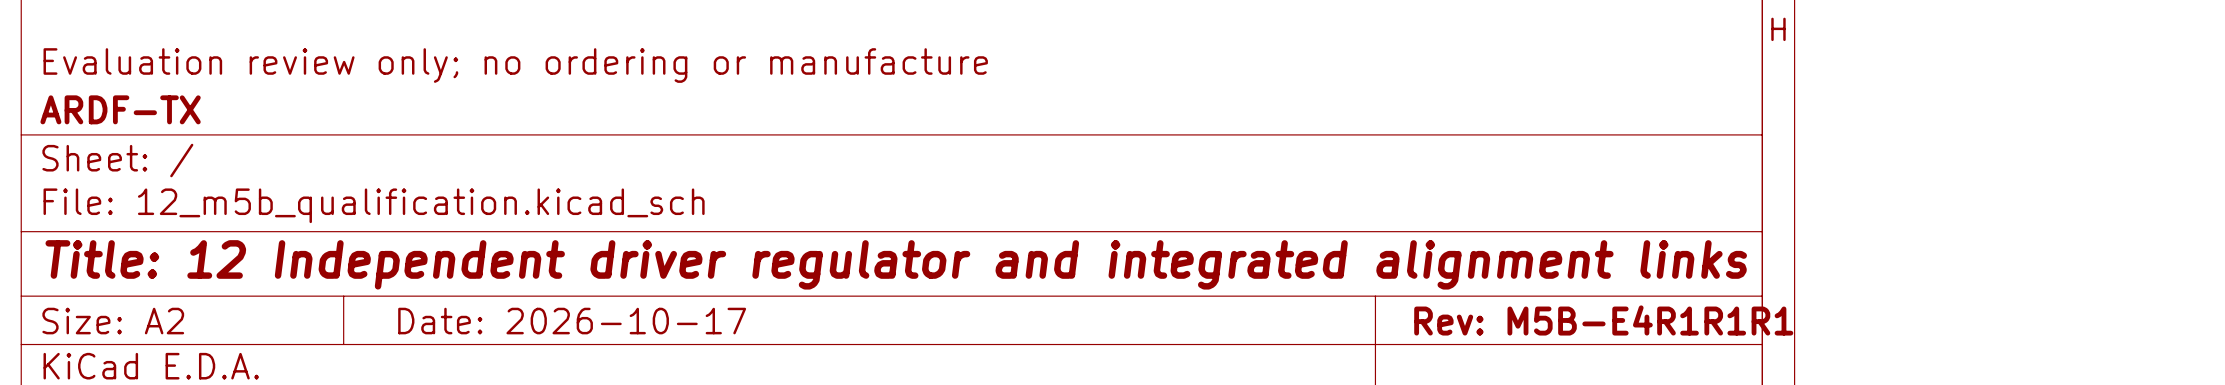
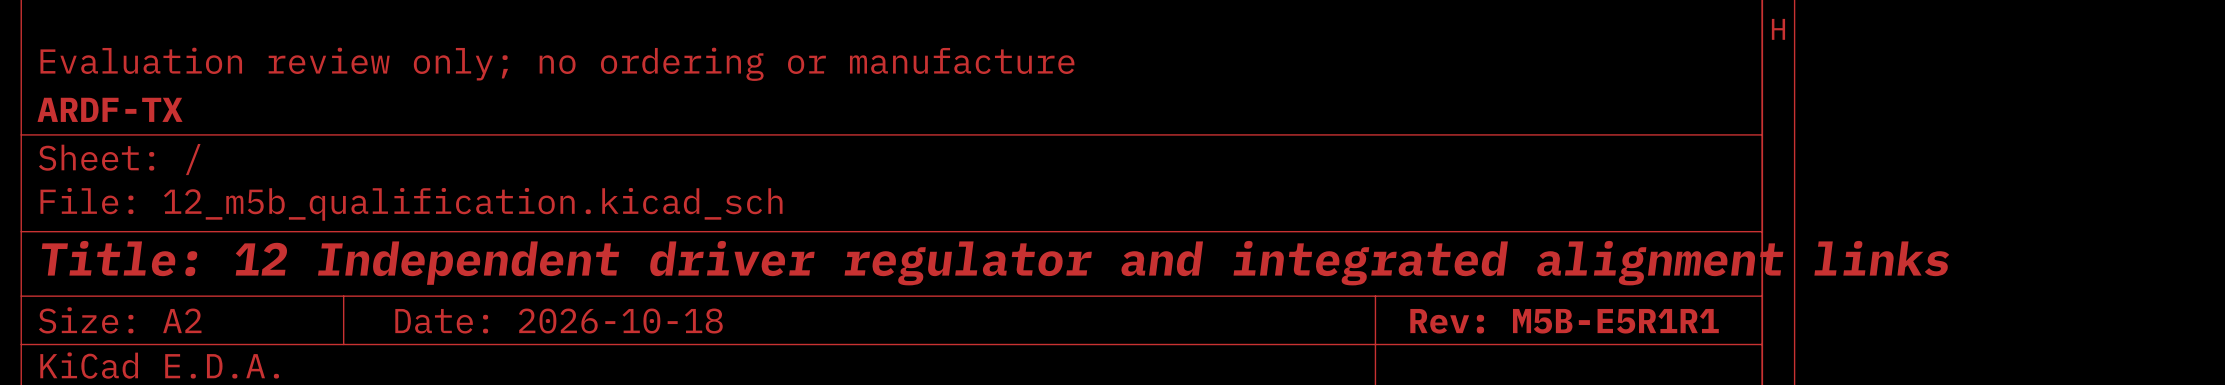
title block: Rev: M5B-E4R1R1R1 (1603, 320) -> Rev: M5B-E5R1R1 (1564, 321)
title block: Date: 2026-10-17 (572, 321) -> Date: 2026-10-18 (559, 321)

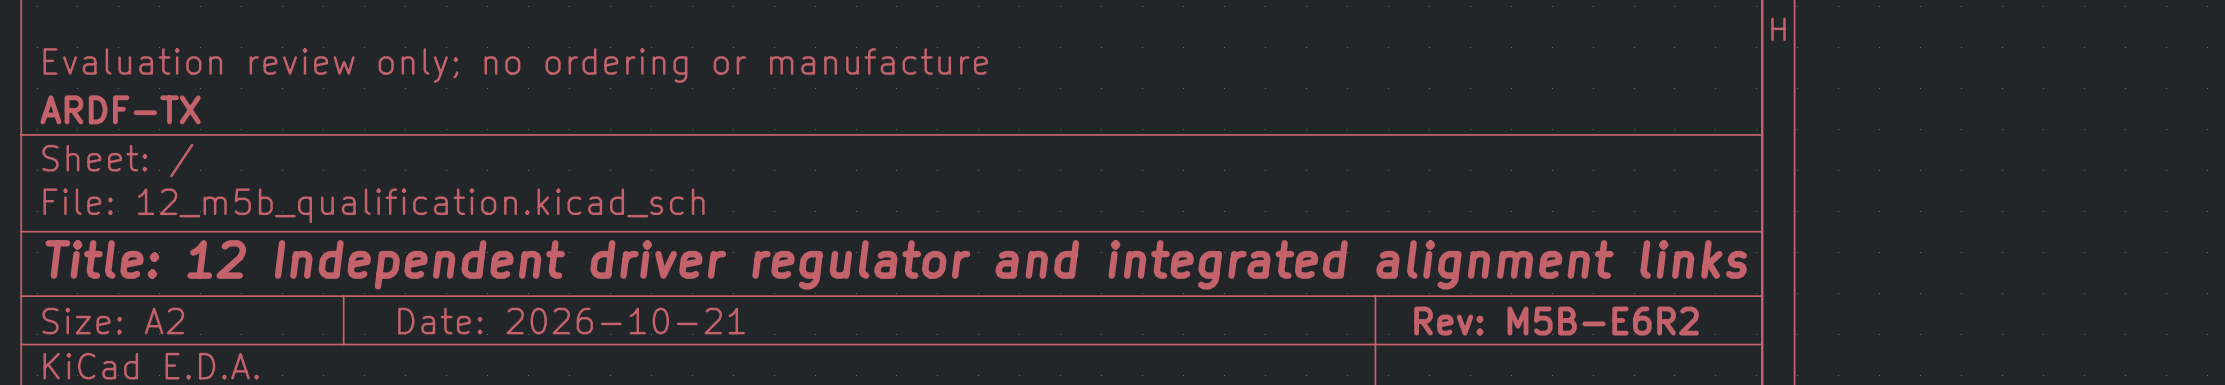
title block: Date: 2026-10-18 (559, 321) -> Date: 2026-10-21 (571, 321)
title block: Rev: M5B-E5R1R1 (1564, 321) -> Rev: M5B-E6R2 (1556, 321)

